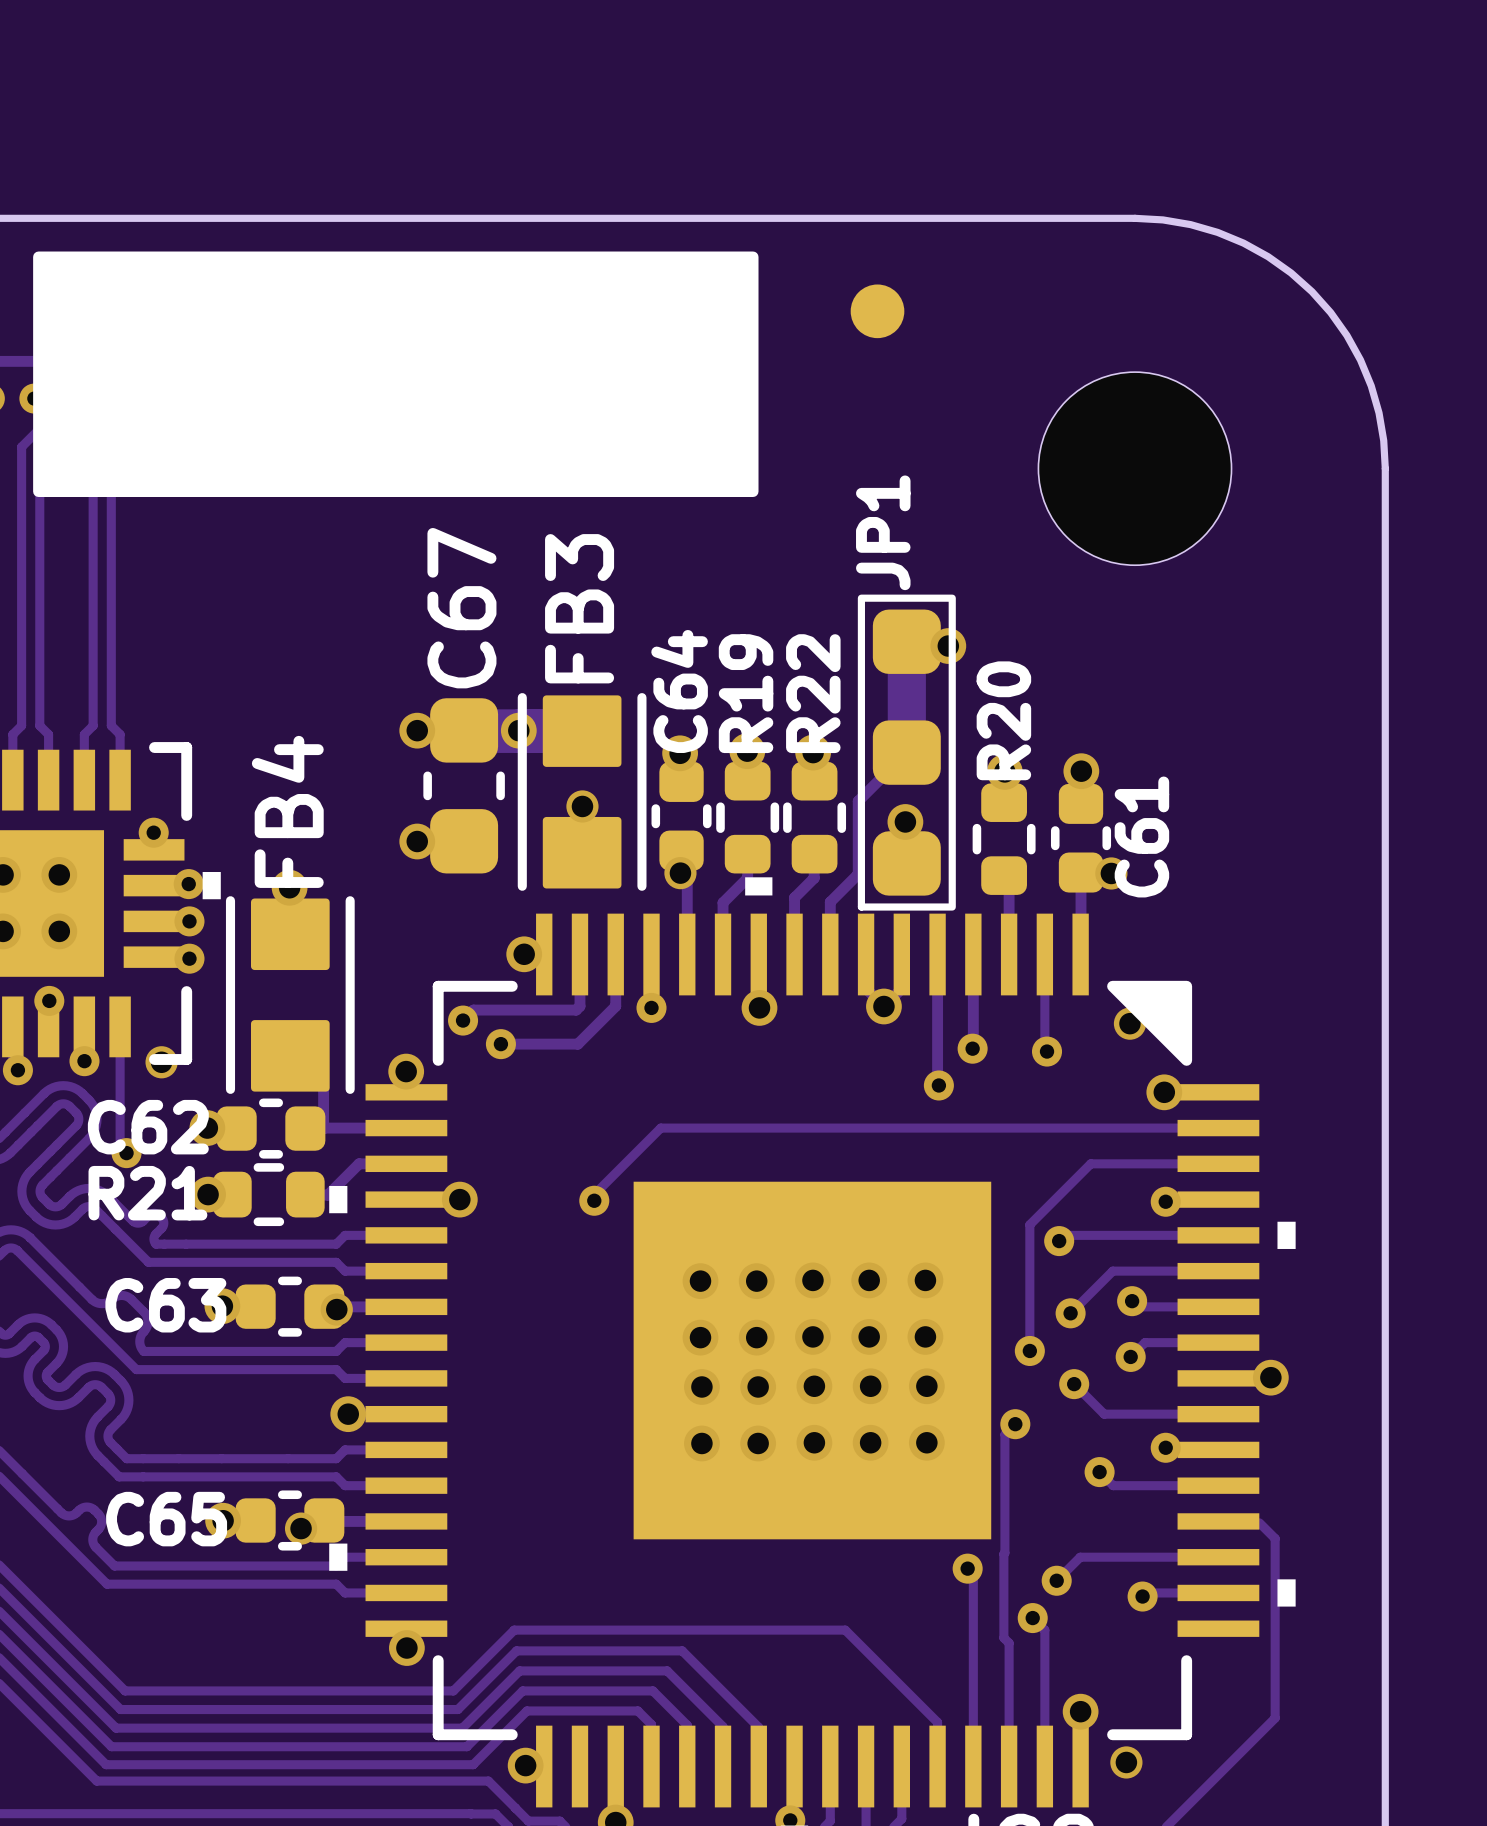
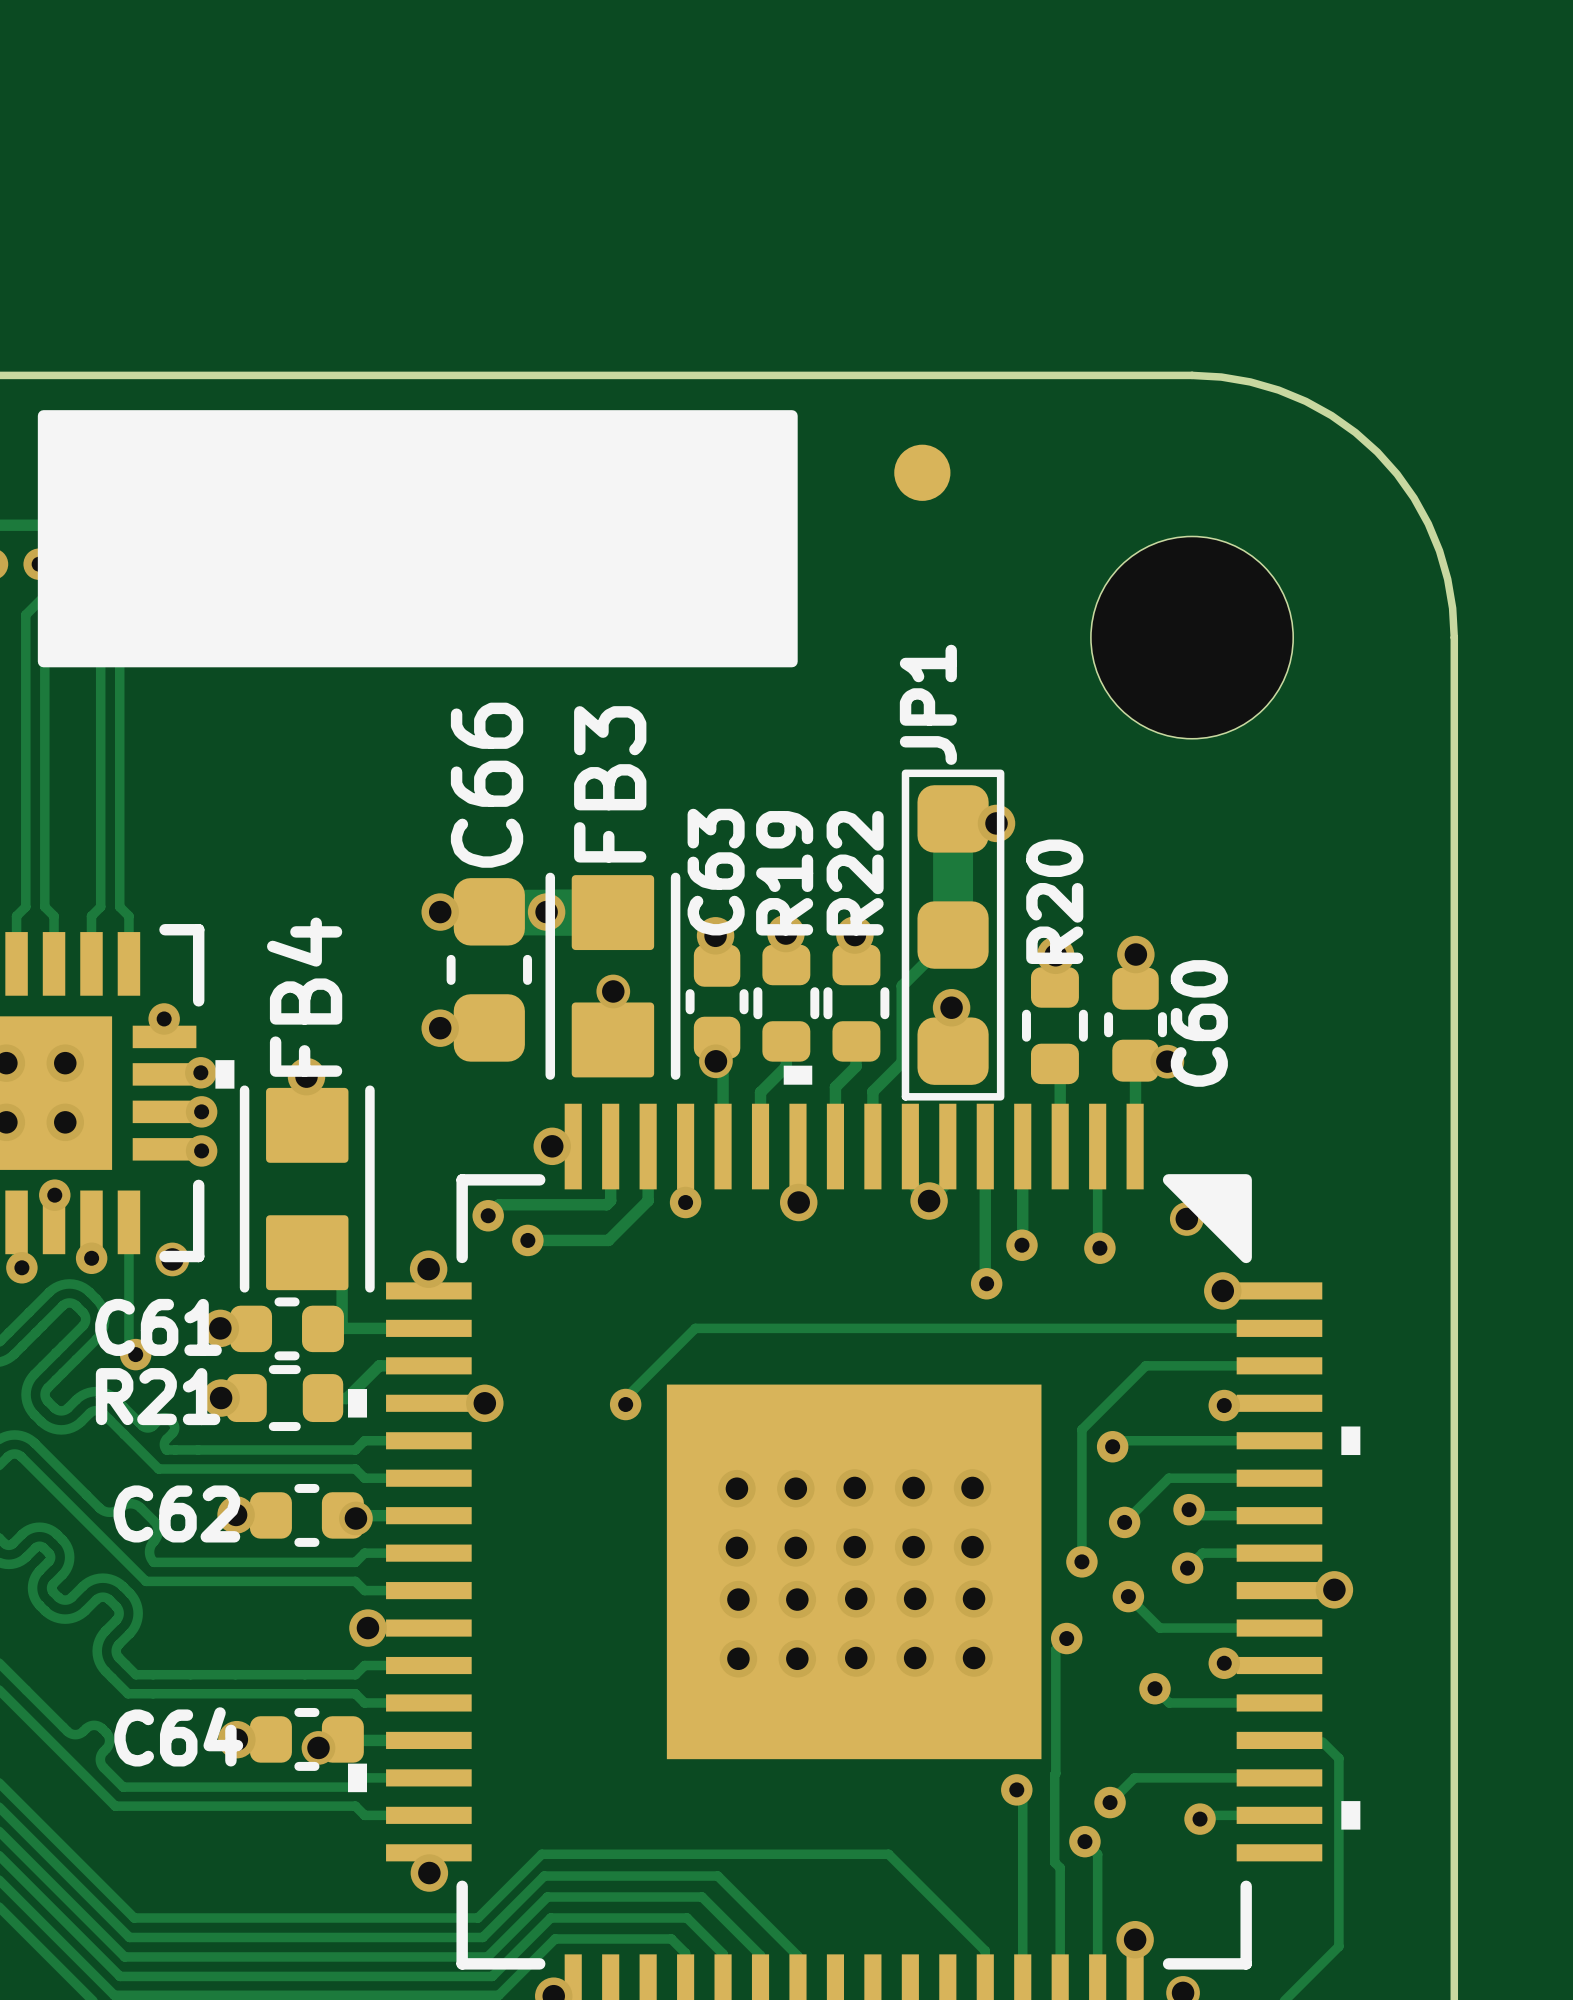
C67 name: C67 (461, 608) -> C66 (487, 785)
C64 name: C64 (679, 691) -> C63 (716, 872)
C61 name: C61 (1141, 836) -> C60 (1199, 1023)
C62 name: C62 (148, 1127) -> C61 (158, 1327)
C63 name: C63 (165, 1305) -> C62 (176, 1513)
C65 name: C65 (166, 1519) -> C64 (178, 1736)

